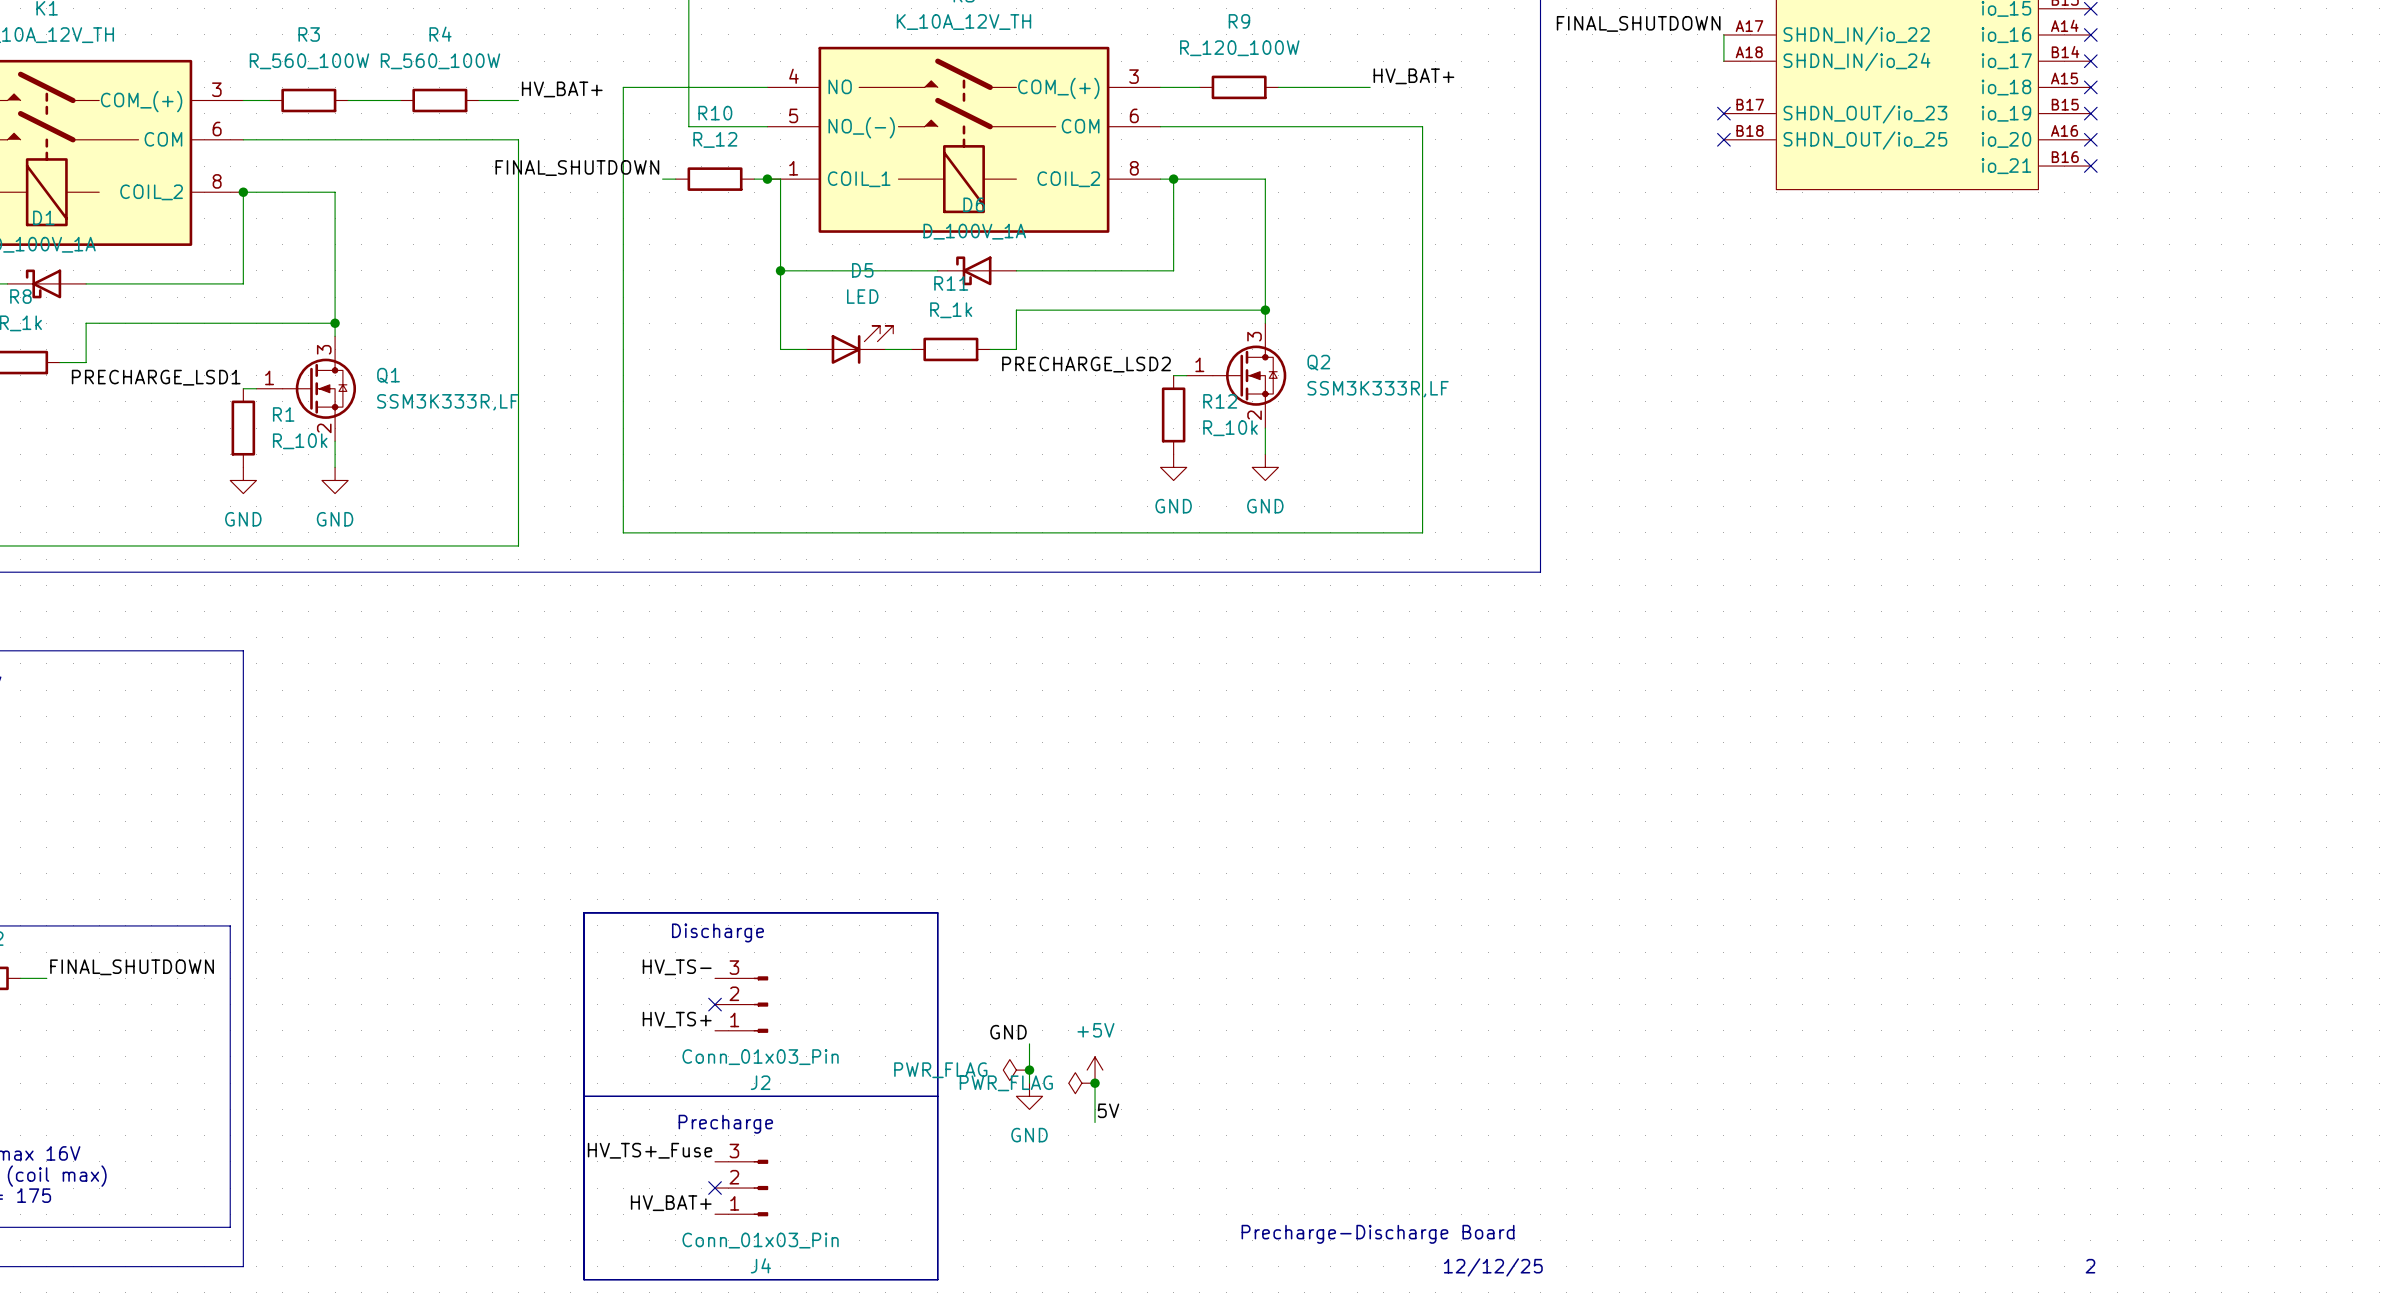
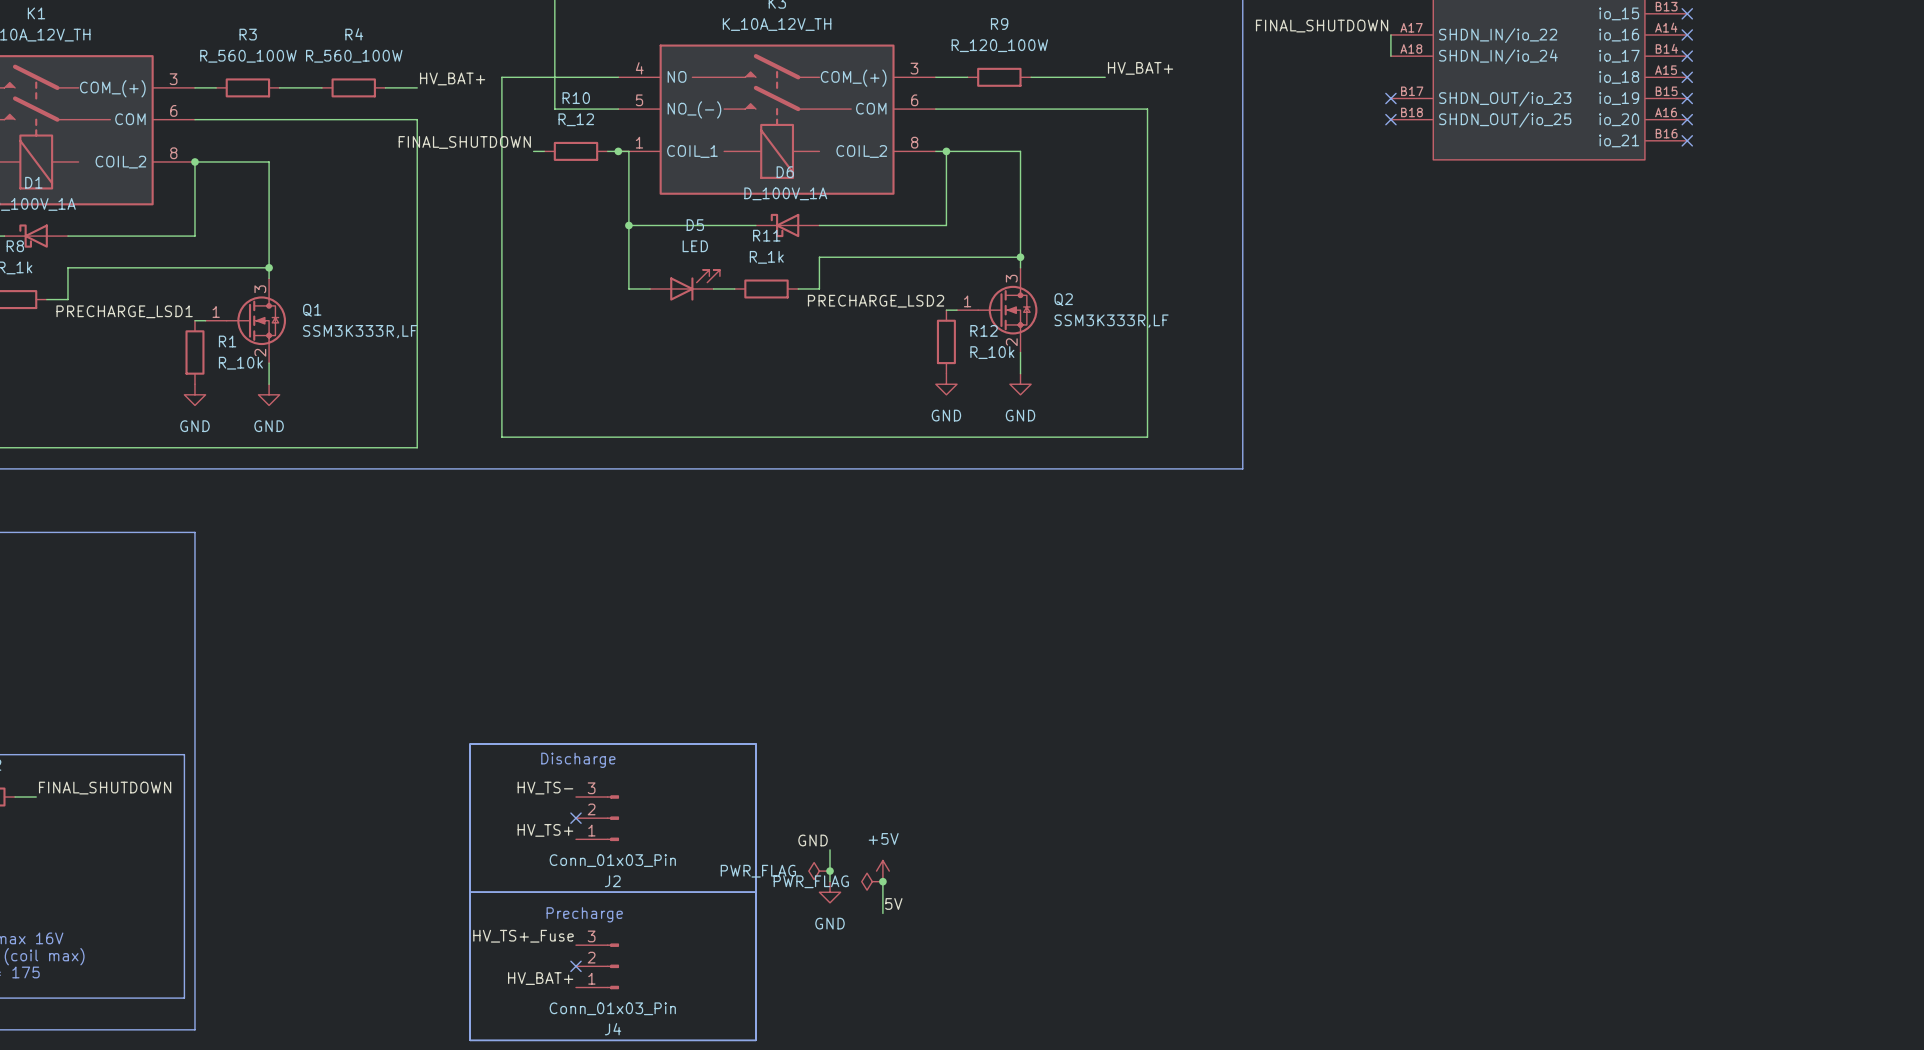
text: Precharge-Discharge Board (1378, 1234) -> none
text: 2 (2090, 1266) -> none
text: 12/12/25 (1493, 1267) -> none

